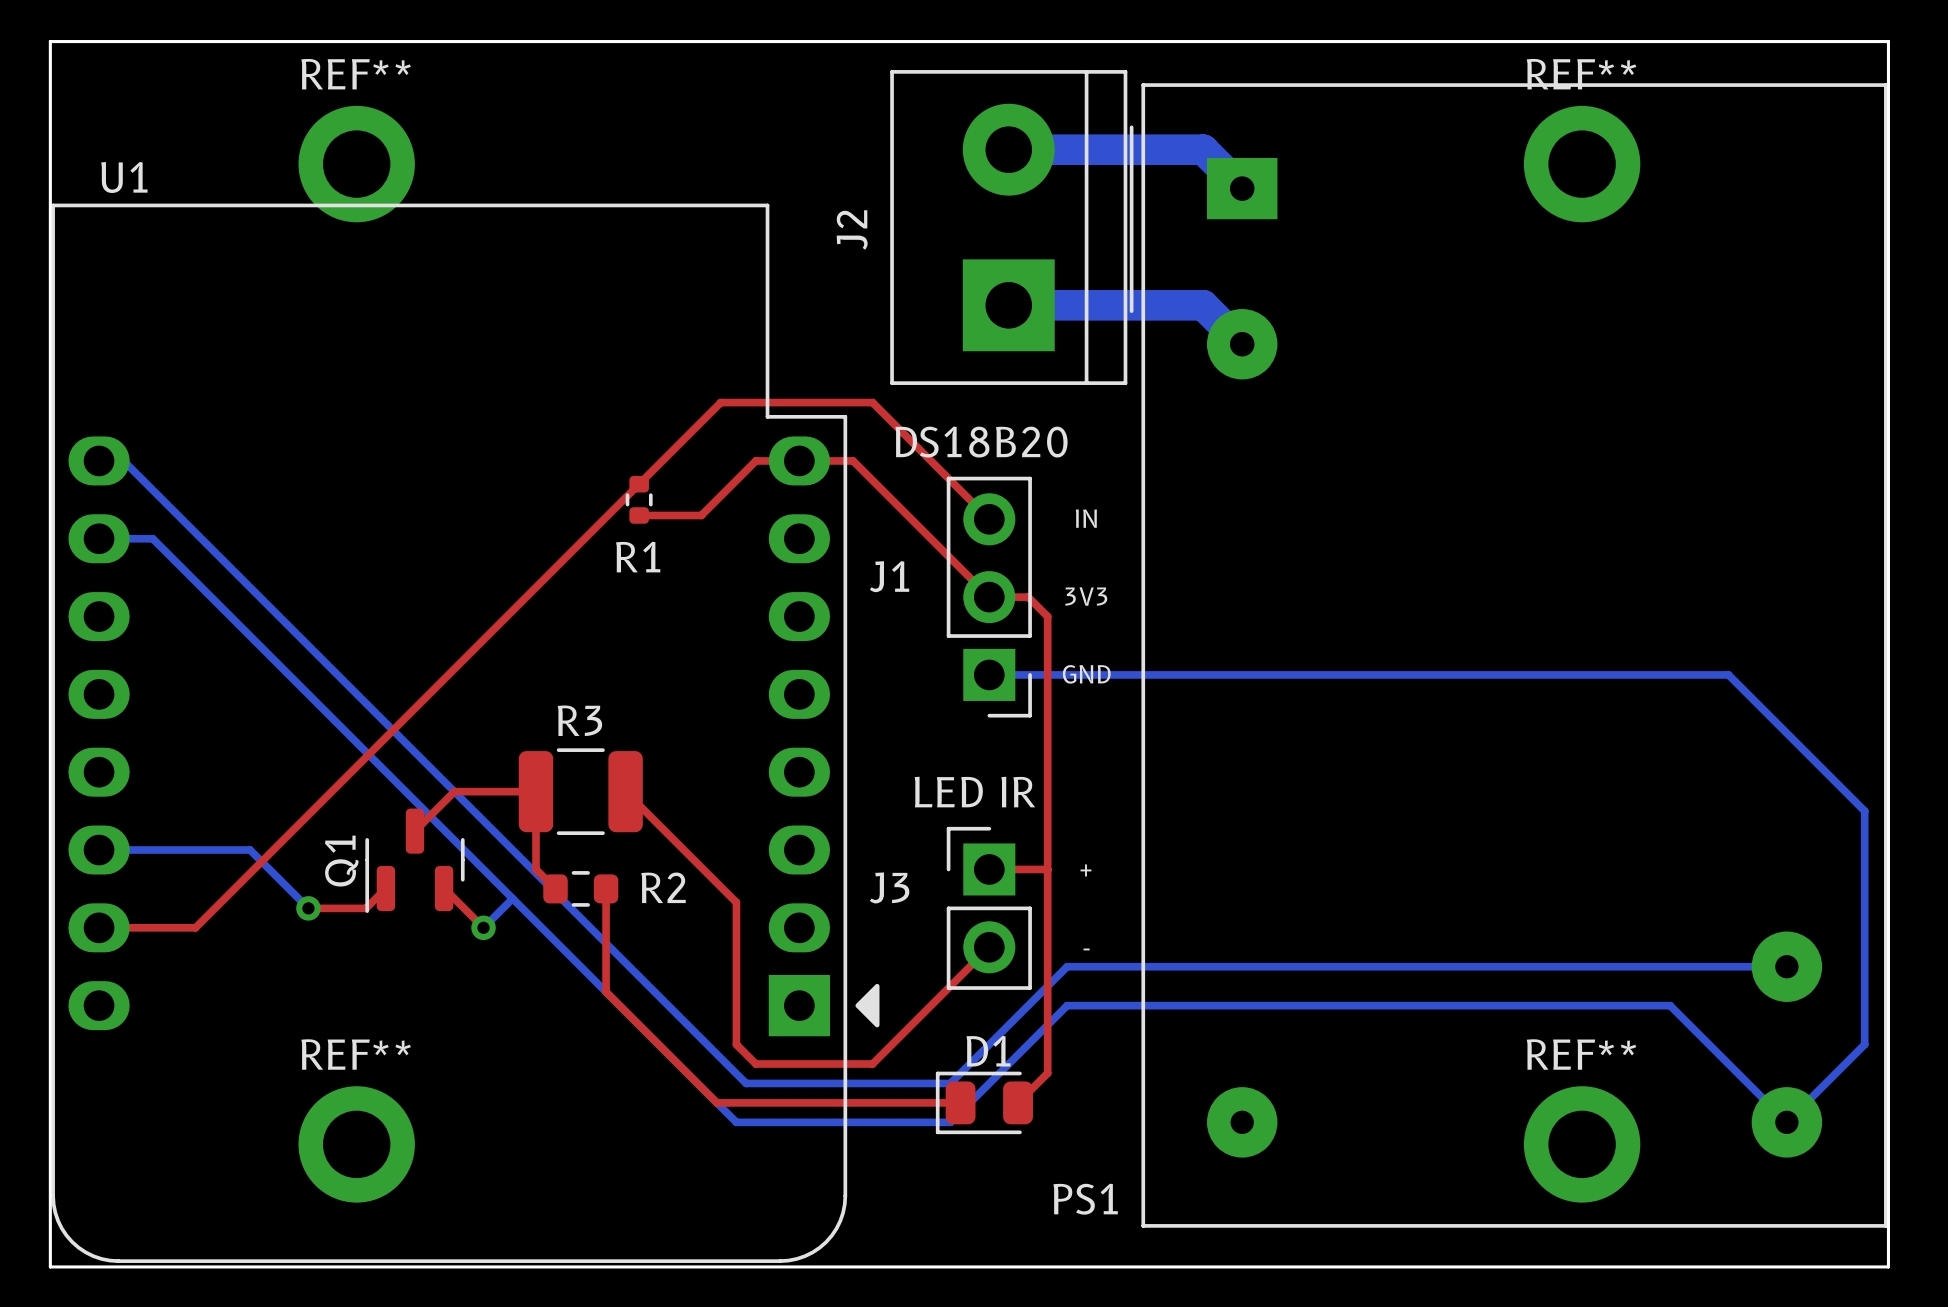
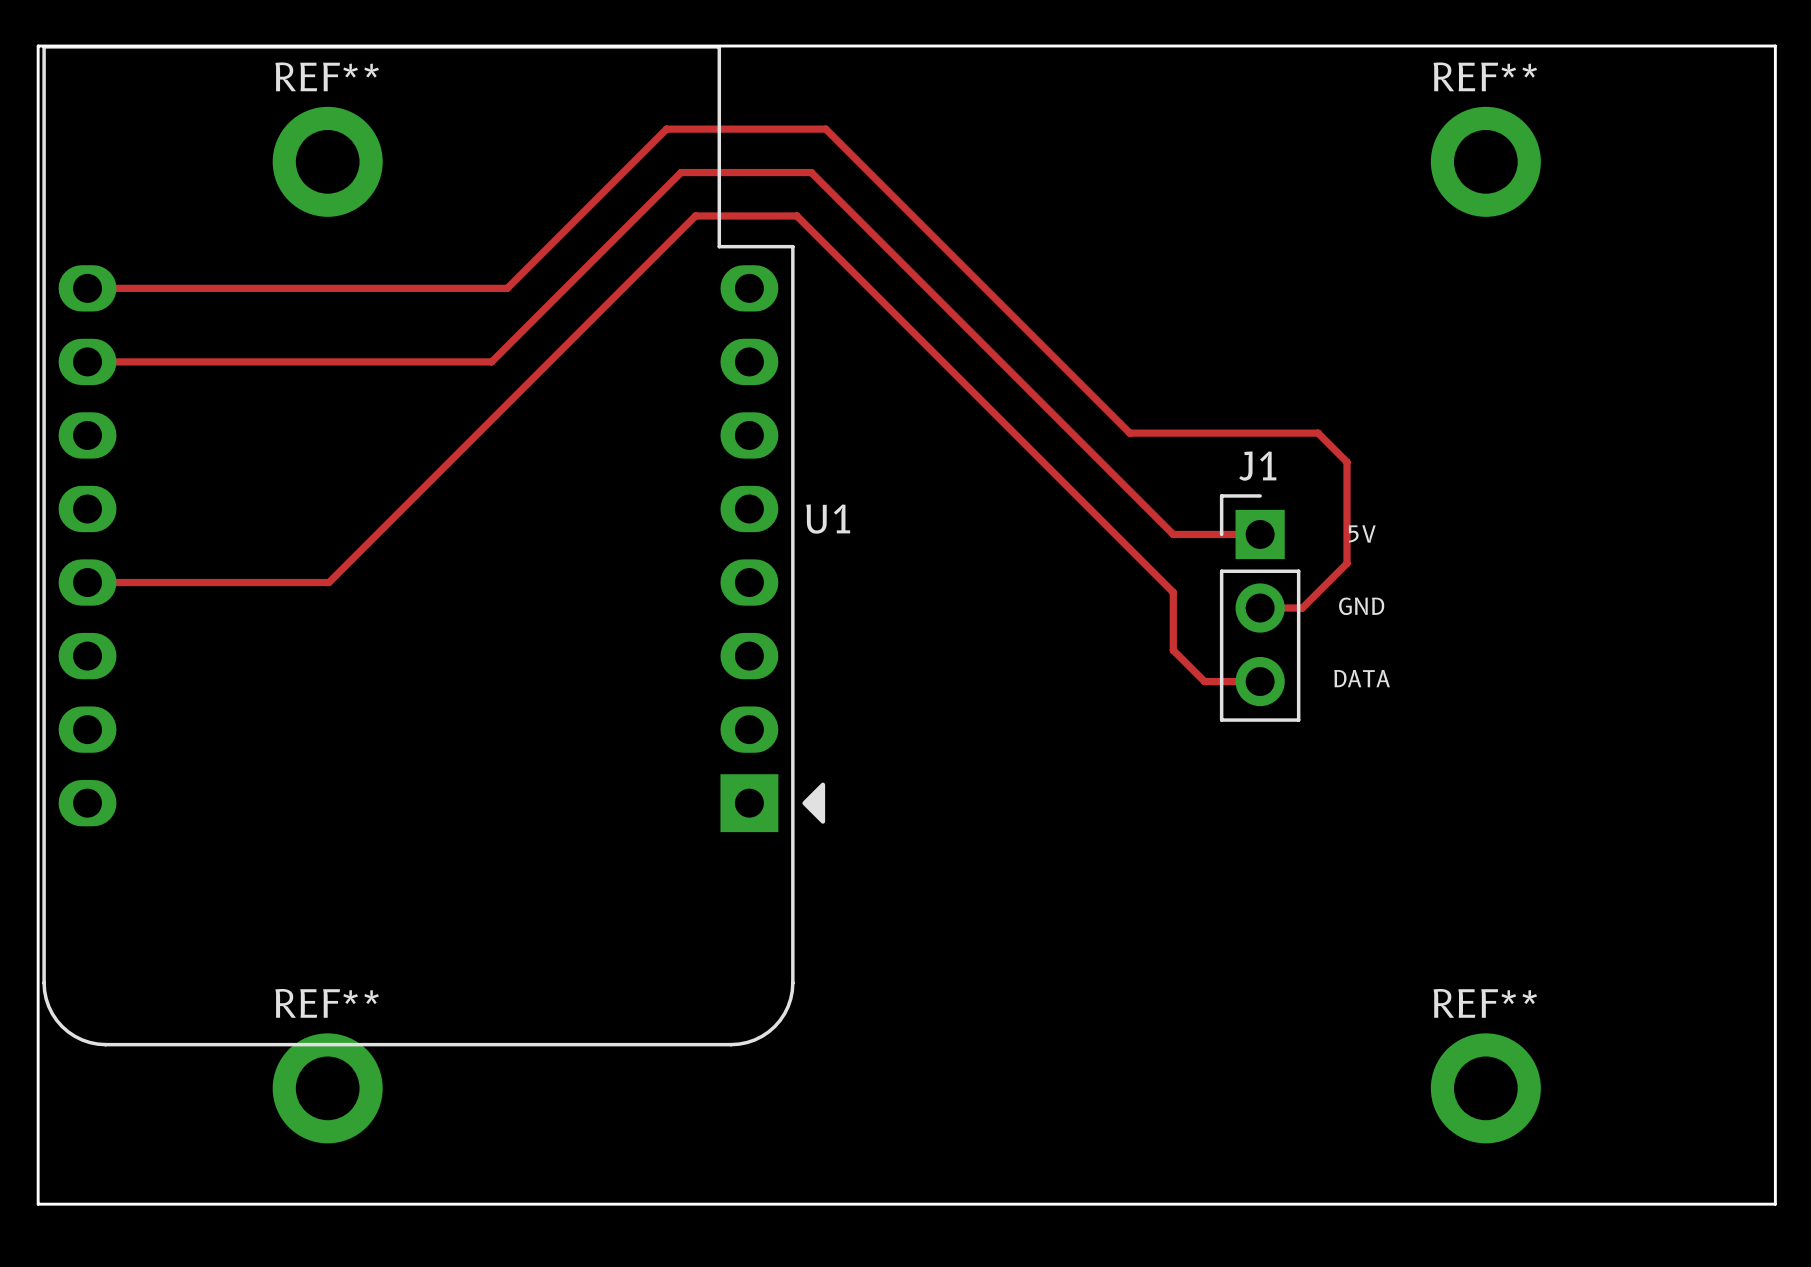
bottom track: (1008, 149) (1203, 149) (1242, 188) -> none
U1 name position: U1 (124, 177) -> U1 (828, 519)
J2: (1008, 227) -> none
top track: none -> (87, 288) (507, 288) (666, 129) (825, 129) (1129, 433) (1318, 433) (1347, 462) (1347, 563) (1302, 608) (1260, 608)
bottom track: (1008, 305) (1203, 305) (1242, 344) -> none
top track: none -> (87, 361) (491, 361) (681, 172) (811, 172) (1173, 534) (1260, 534)
text: DS18B20 (981, 442) -> none
bottom track: (99, 460) (123, 460) (746, 1083) (950, 1083) (1067, 966) (1786, 966) -> none
R1: (639, 499) -> none
top track: (639, 515) (701, 515) (755, 460) (853, 460) (989, 597) (1028, 597) (1047, 616) (1047, 1073) (1018, 1102) -> none
text: IN (1086, 518) -> none
top track: (989, 519) (872, 402) (720, 402) (195, 927) (99, 927) -> none
bottom track: (99, 538) (152, 538) (736, 1122) (950, 1122) (1067, 1005) (1670, 1005) (1786, 1122) (1864, 1044) (1864, 811) (1728, 674) (989, 674) -> none
text: none -> 5V (1362, 533)
J1 name position: J1 (889, 576) -> J1 (1257, 466)
text: 3V3 (1086, 596) -> none
J1 rotation: 0° (989, 597) -> 180° (1260, 608)
J1 position: (989, 597) -> (1260, 608)
top track: none -> (87, 582) (329, 582) (695, 215) (796, 215) (1173, 592) (1173, 650) (1204, 681) (1260, 681)
PS1: (1508, 655) -> none
text position: GND (1086, 674) -> GND (1361, 606)
text: none -> DATA (1362, 678)
U1 position: (465, 733) -> (433, 545)
R3: (580, 791) -> none
top track: (625, 791) (736, 902) (736, 1044) (755, 1064) (872, 1064) (989, 947) -> none
text: LED IR (974, 792) -> none
top track: (414, 831) (454, 791) (535, 791) (535, 869) (555, 888) -> none
bottom track: (99, 850) (250, 850) (308, 908) -> none
Q1: (414, 860) -> none
top track: (989, 869) (1047, 869) -> none
text: + (1085, 870) -> none
top track: (385, 888) (366, 908) (308, 908) -> none
top track: (444, 888) (483, 927) -> none
R2: (580, 888) -> none
top track: (606, 888) (606, 992) (716, 1102) (960, 1102) -> none
bottom track: (512, 898) (483, 927) -> none
via: (308, 908) -> none
J3: (989, 908) -> none
via: (483, 927) -> none
text: - (1086, 949) -> none
D1: (984, 1102) -> none

